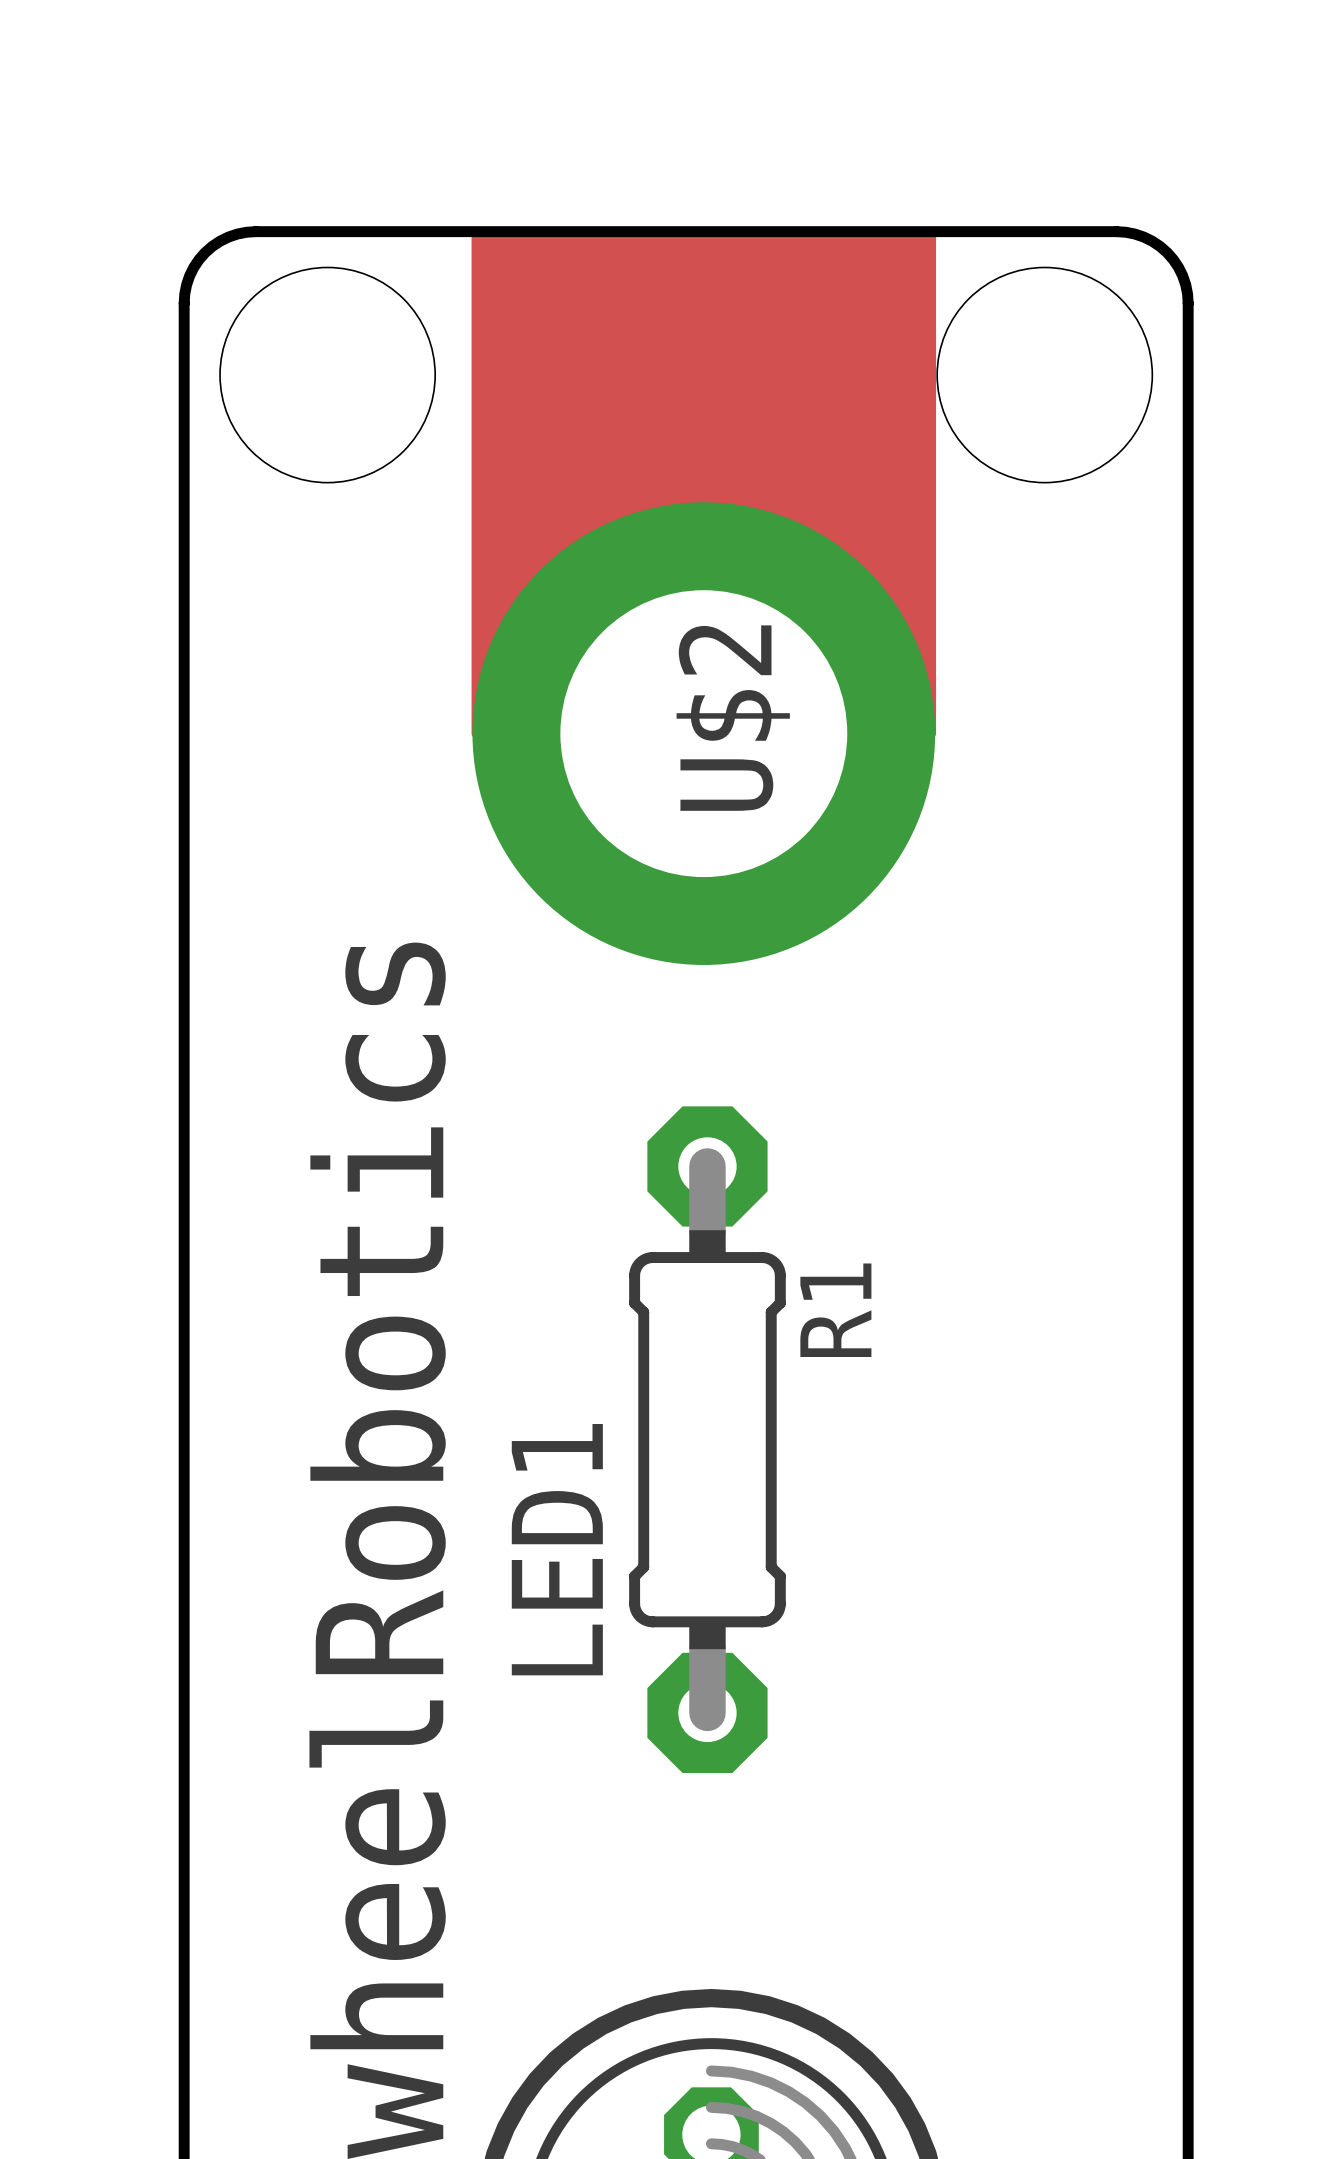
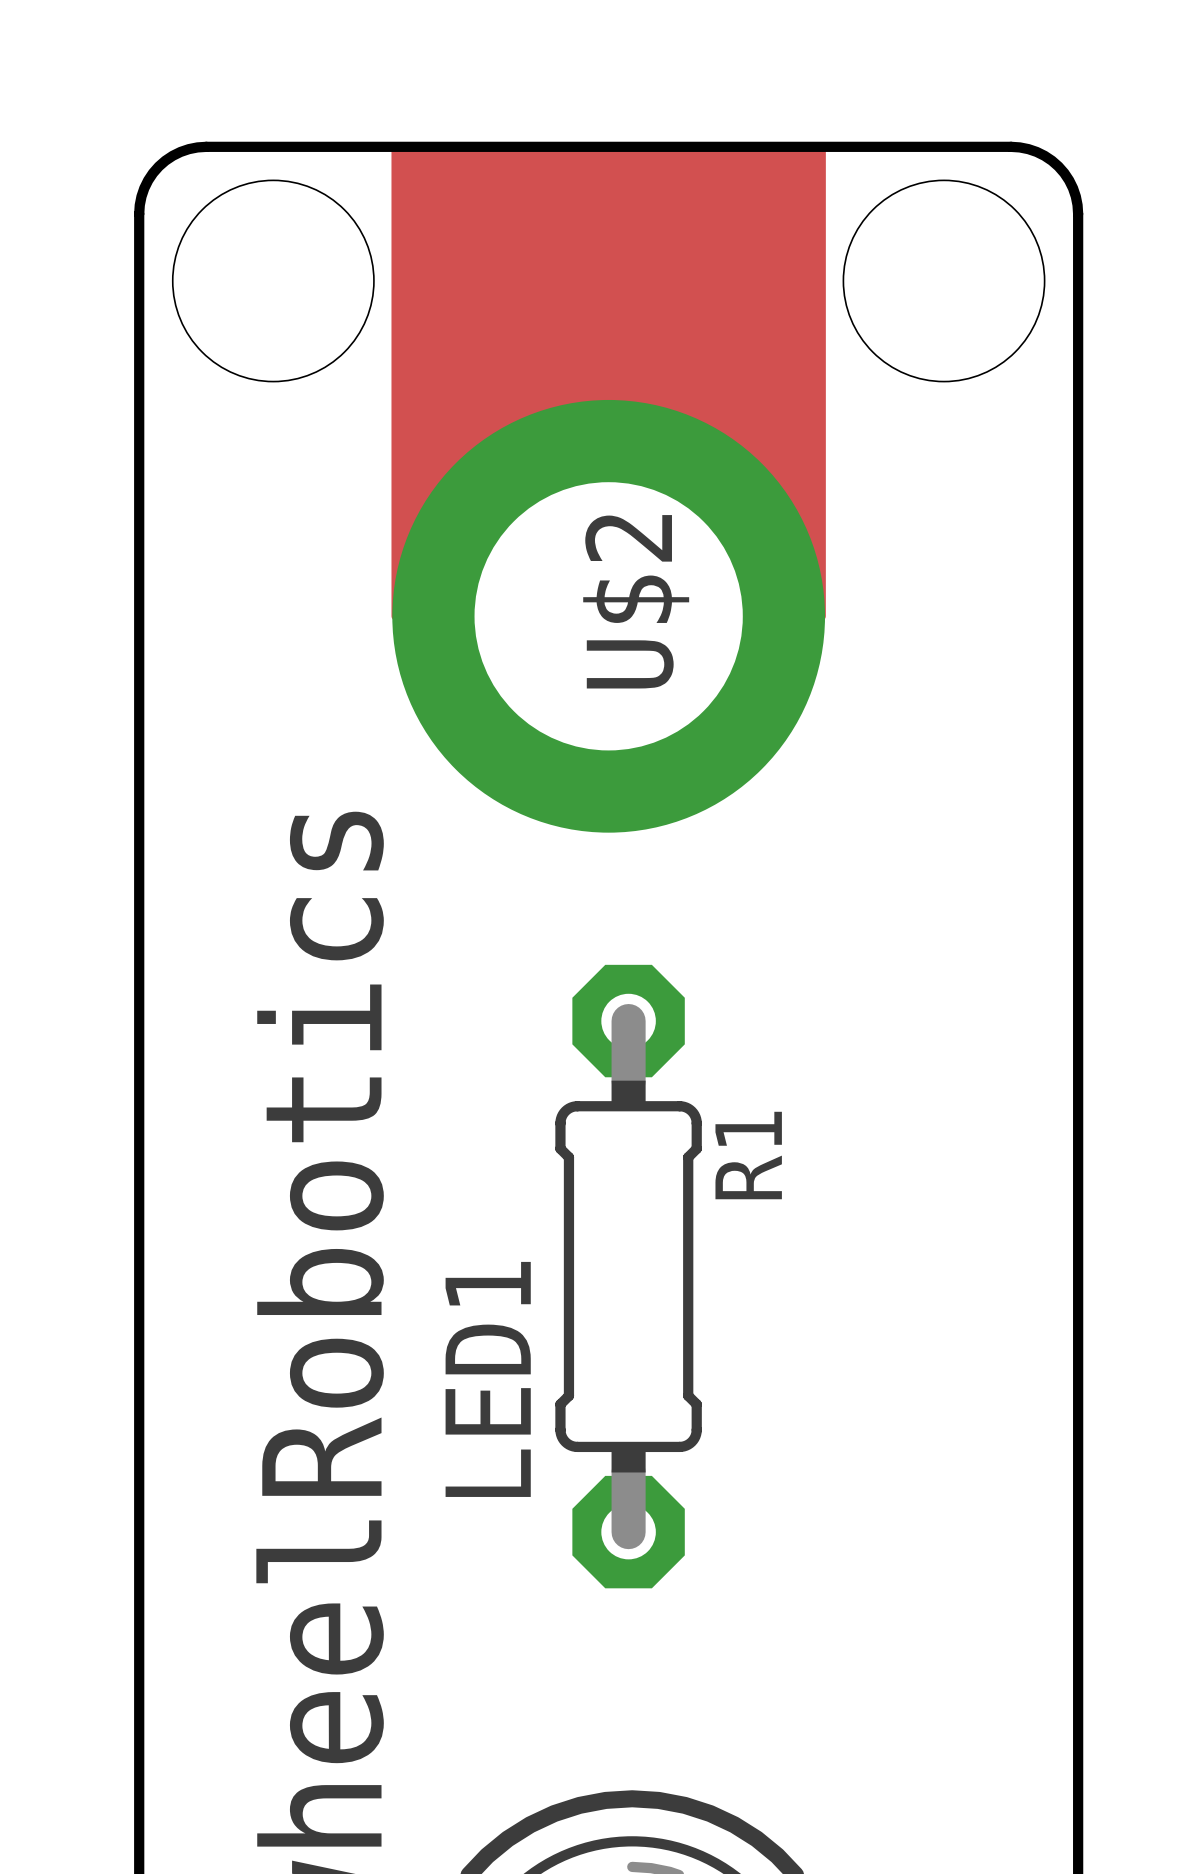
U$2 position: (703, 596) -> (608, 488)

